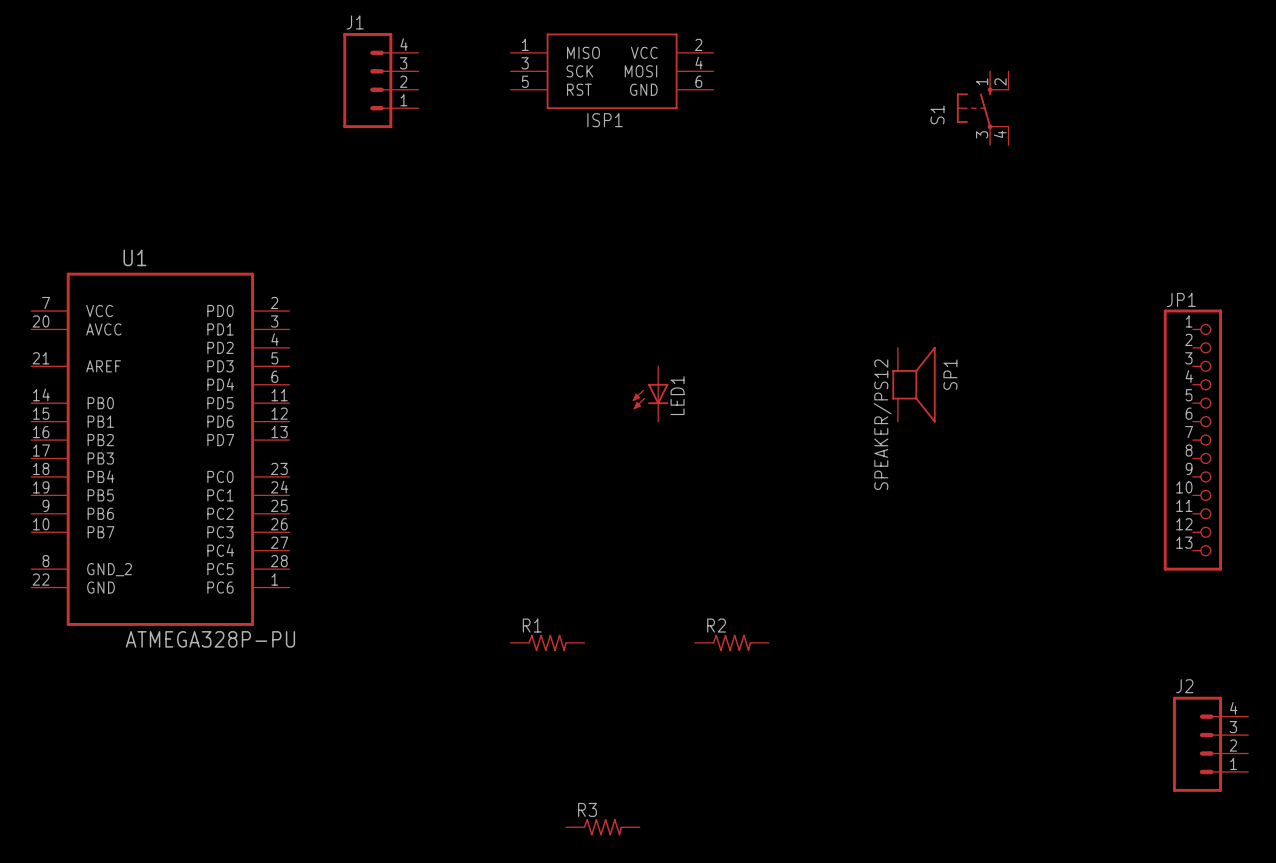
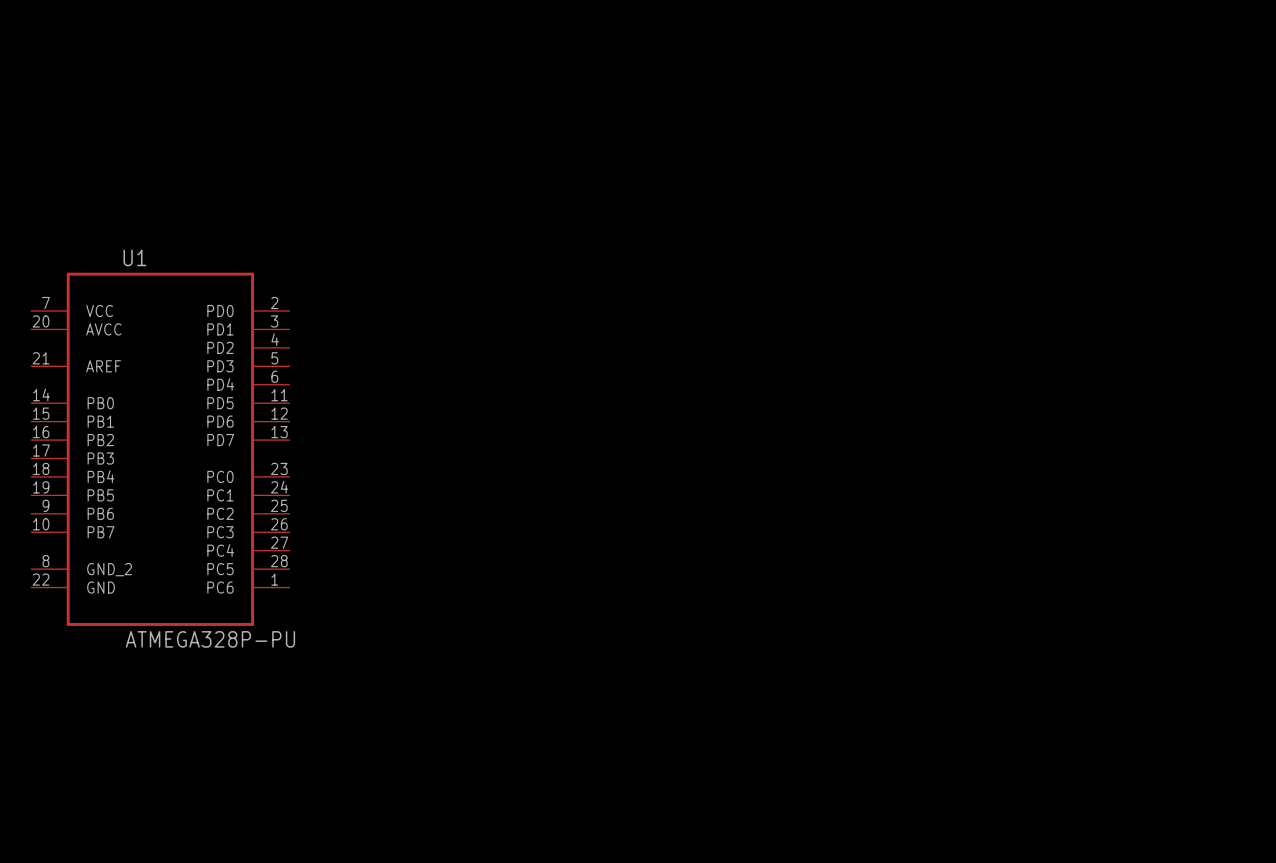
ISP1: (612, 71) -> none
J1: (380, 80) -> none
S1: (982, 108) -> none
SP1: SPEAKER/PS12 (914, 384) -> none
LED1: (650, 393) -> none
JP1: (1192, 440) -> none
R1: (547, 642) -> none
R2: (731, 642) -> none
J2: (1210, 744) -> none
R3: (602, 827) -> none

